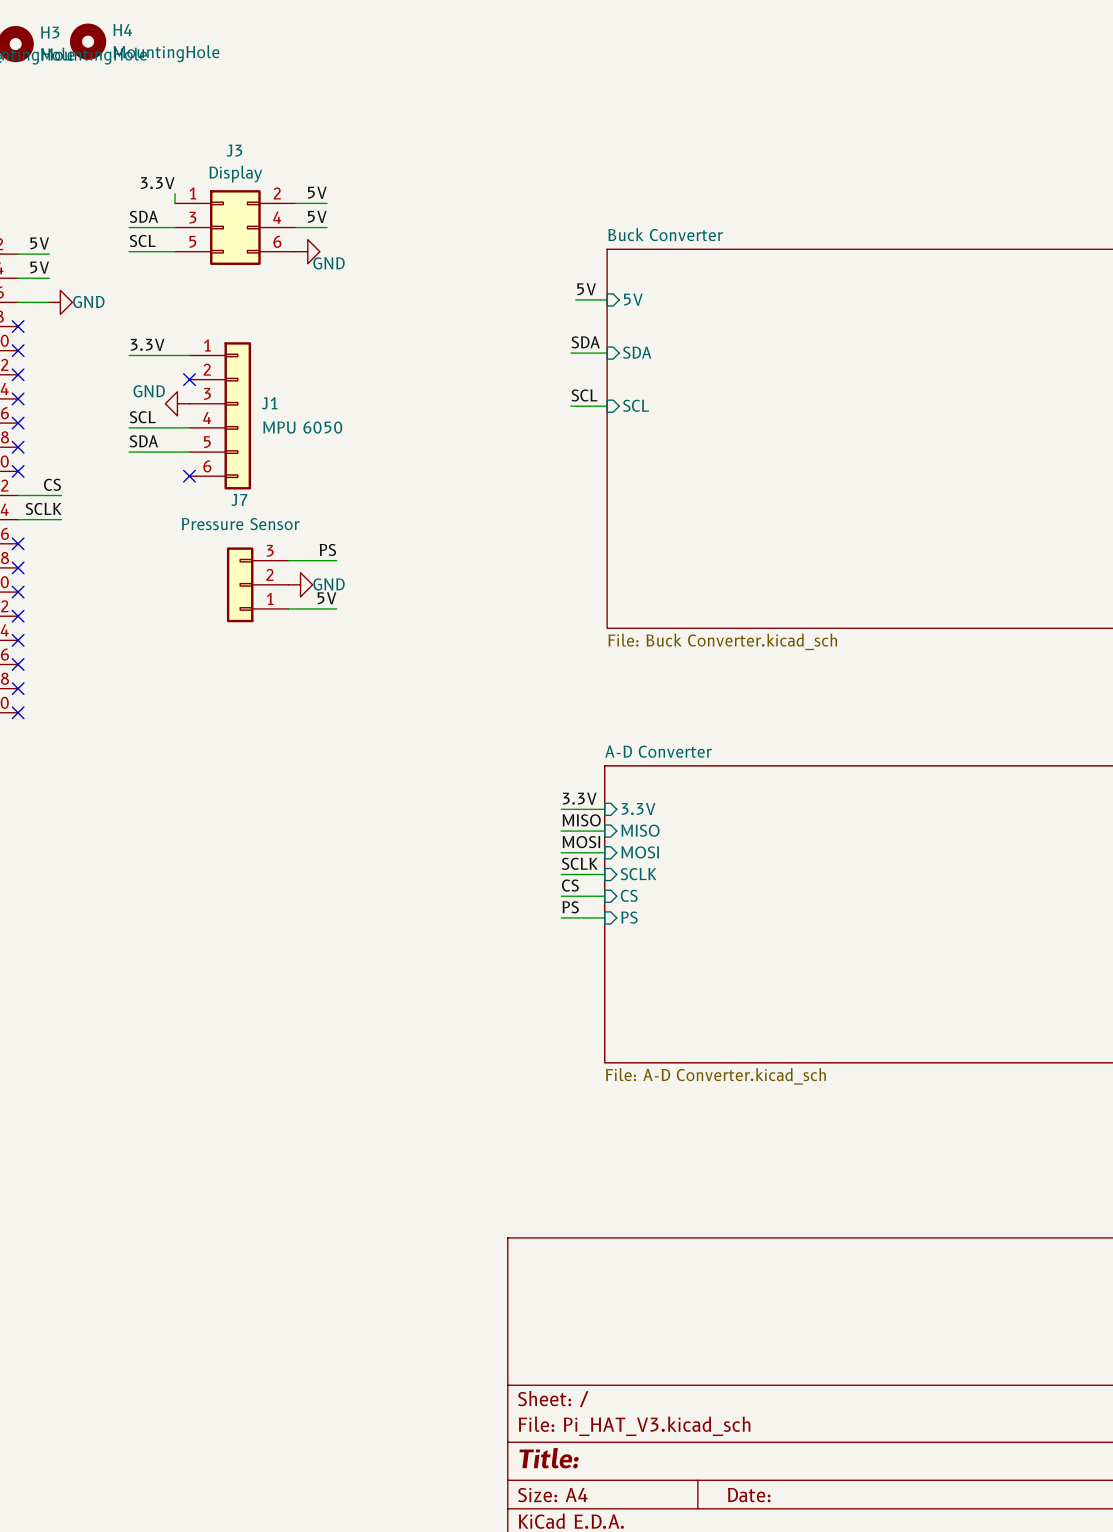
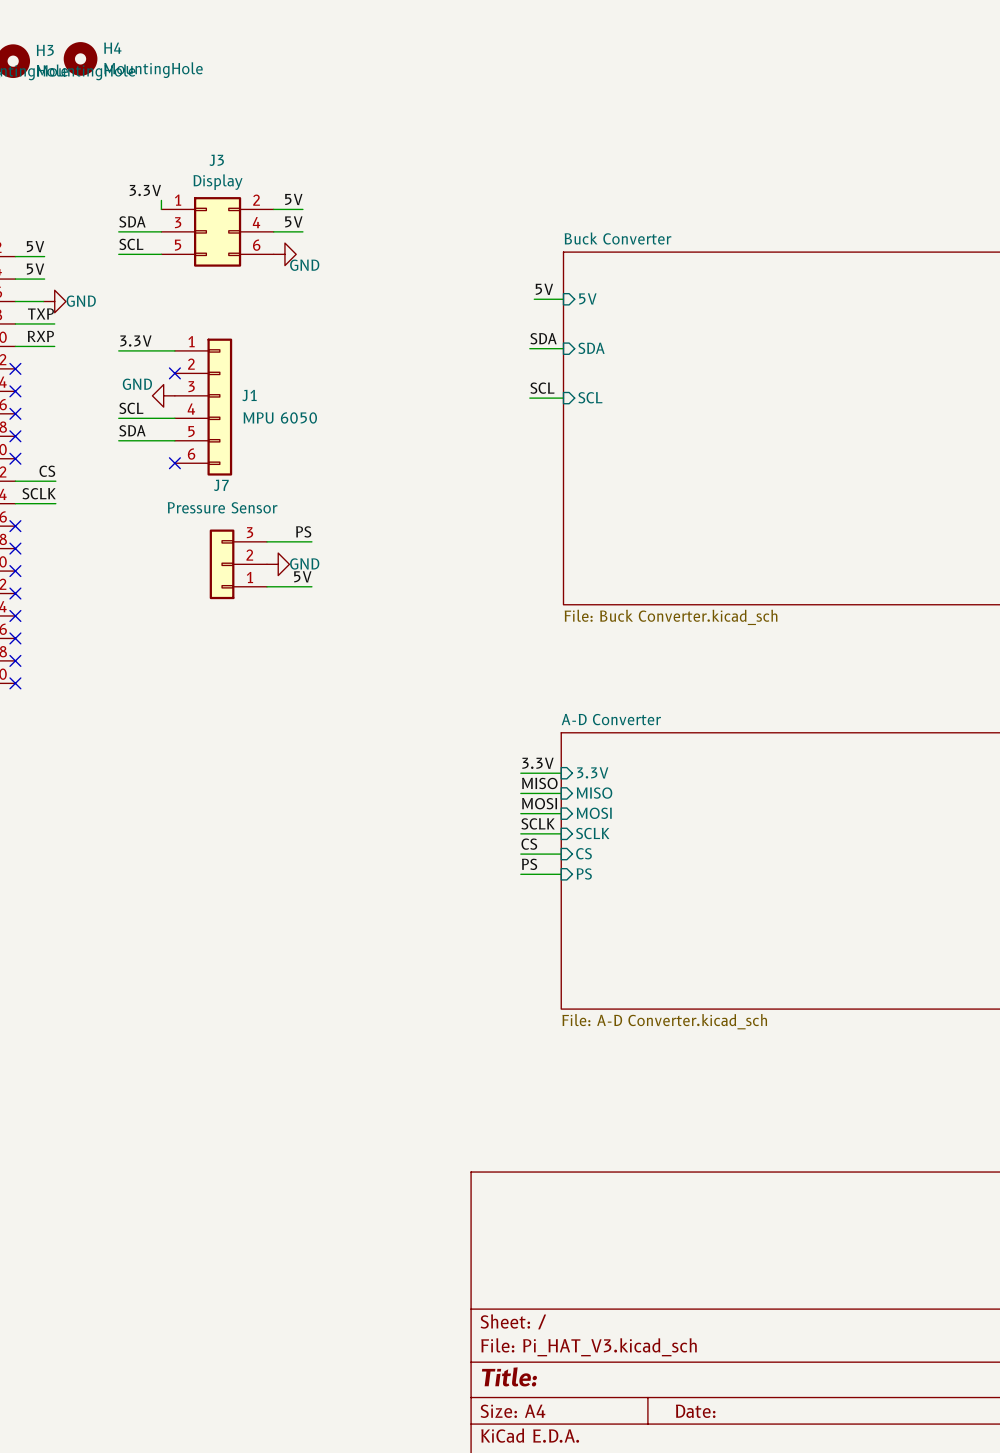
label: none -> TXP (40, 313)
wire: none -> (15, 323) (54, 323)
no-connect mark: (18, 326) -> none
label: none -> RXP (40, 336)
wire: none -> (15, 346) (54, 346)
no-connect mark: (18, 350) -> none

